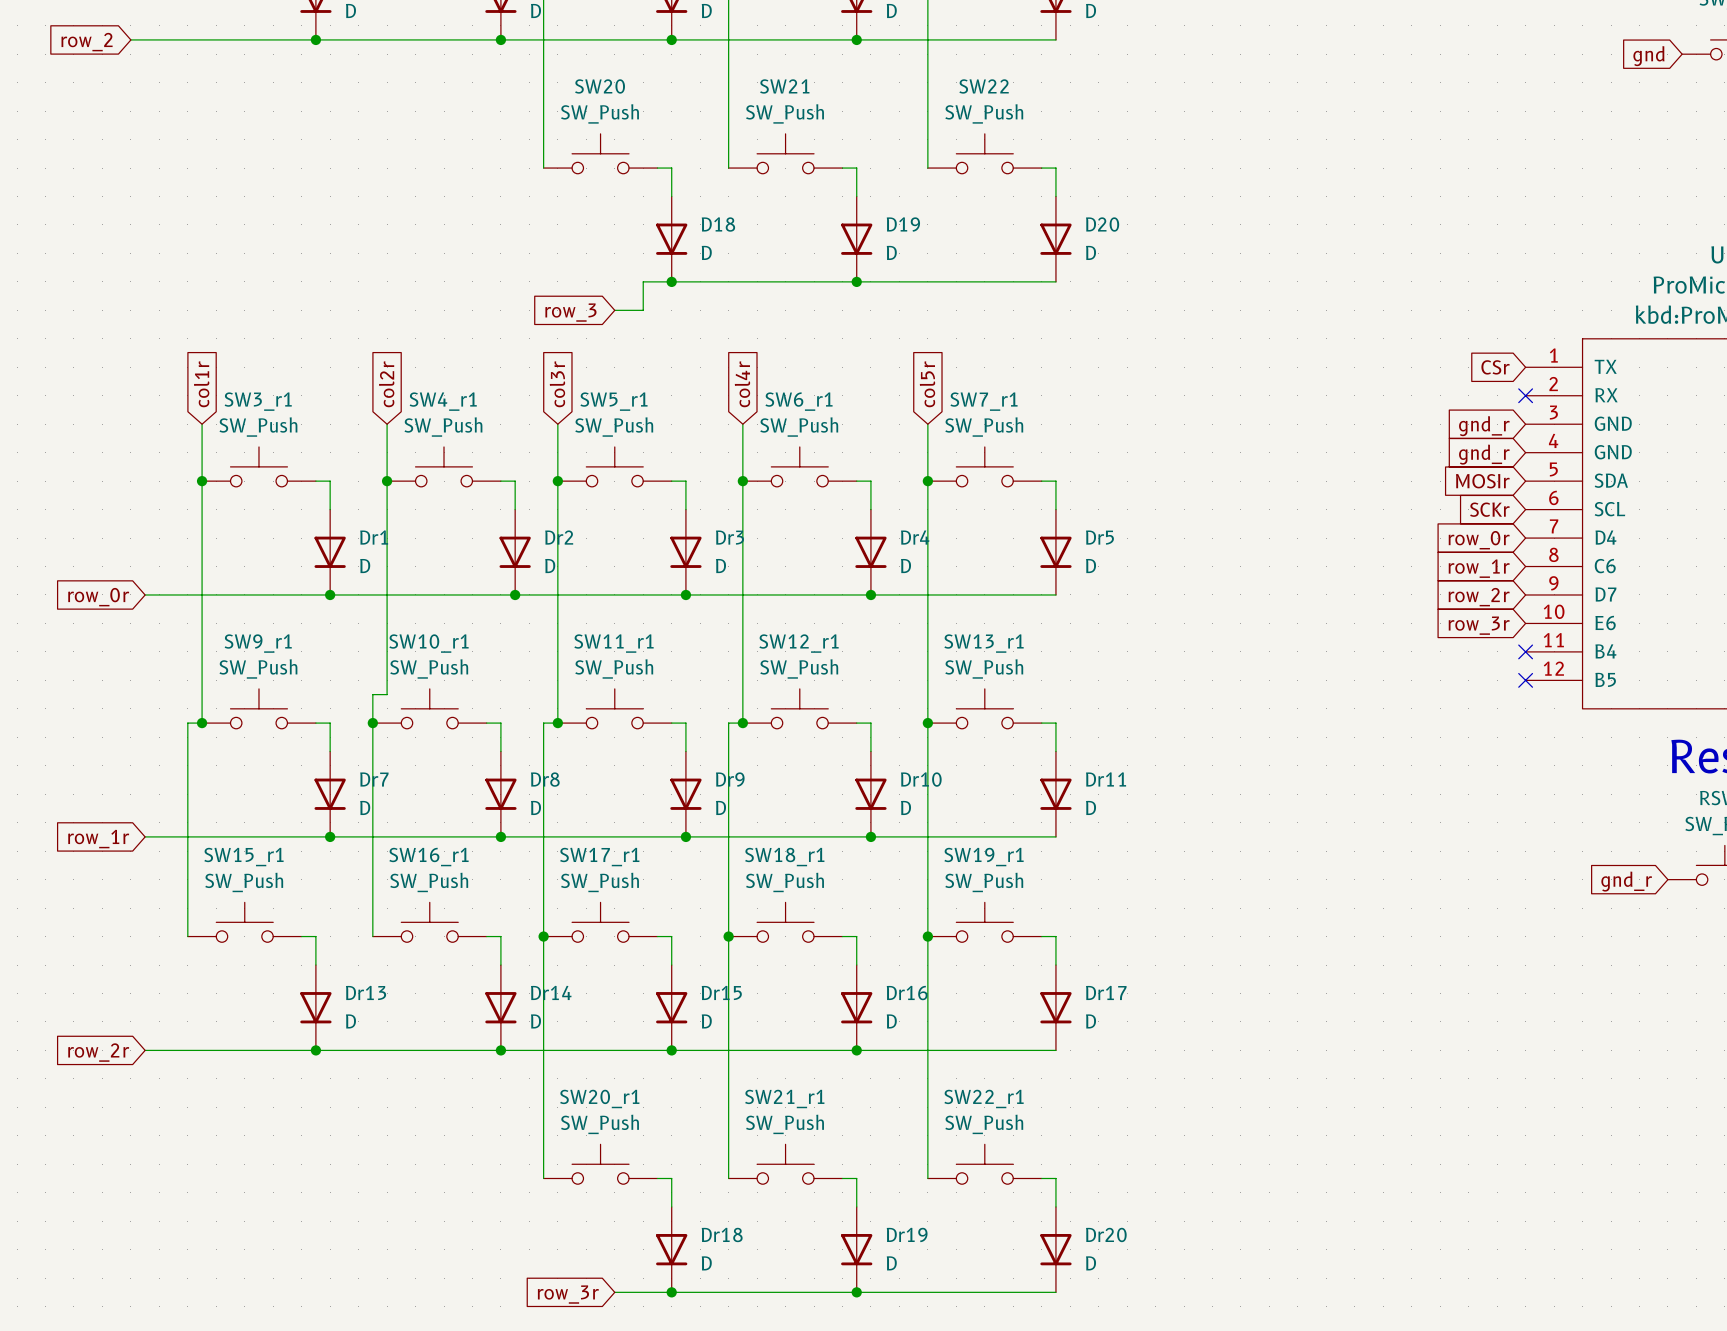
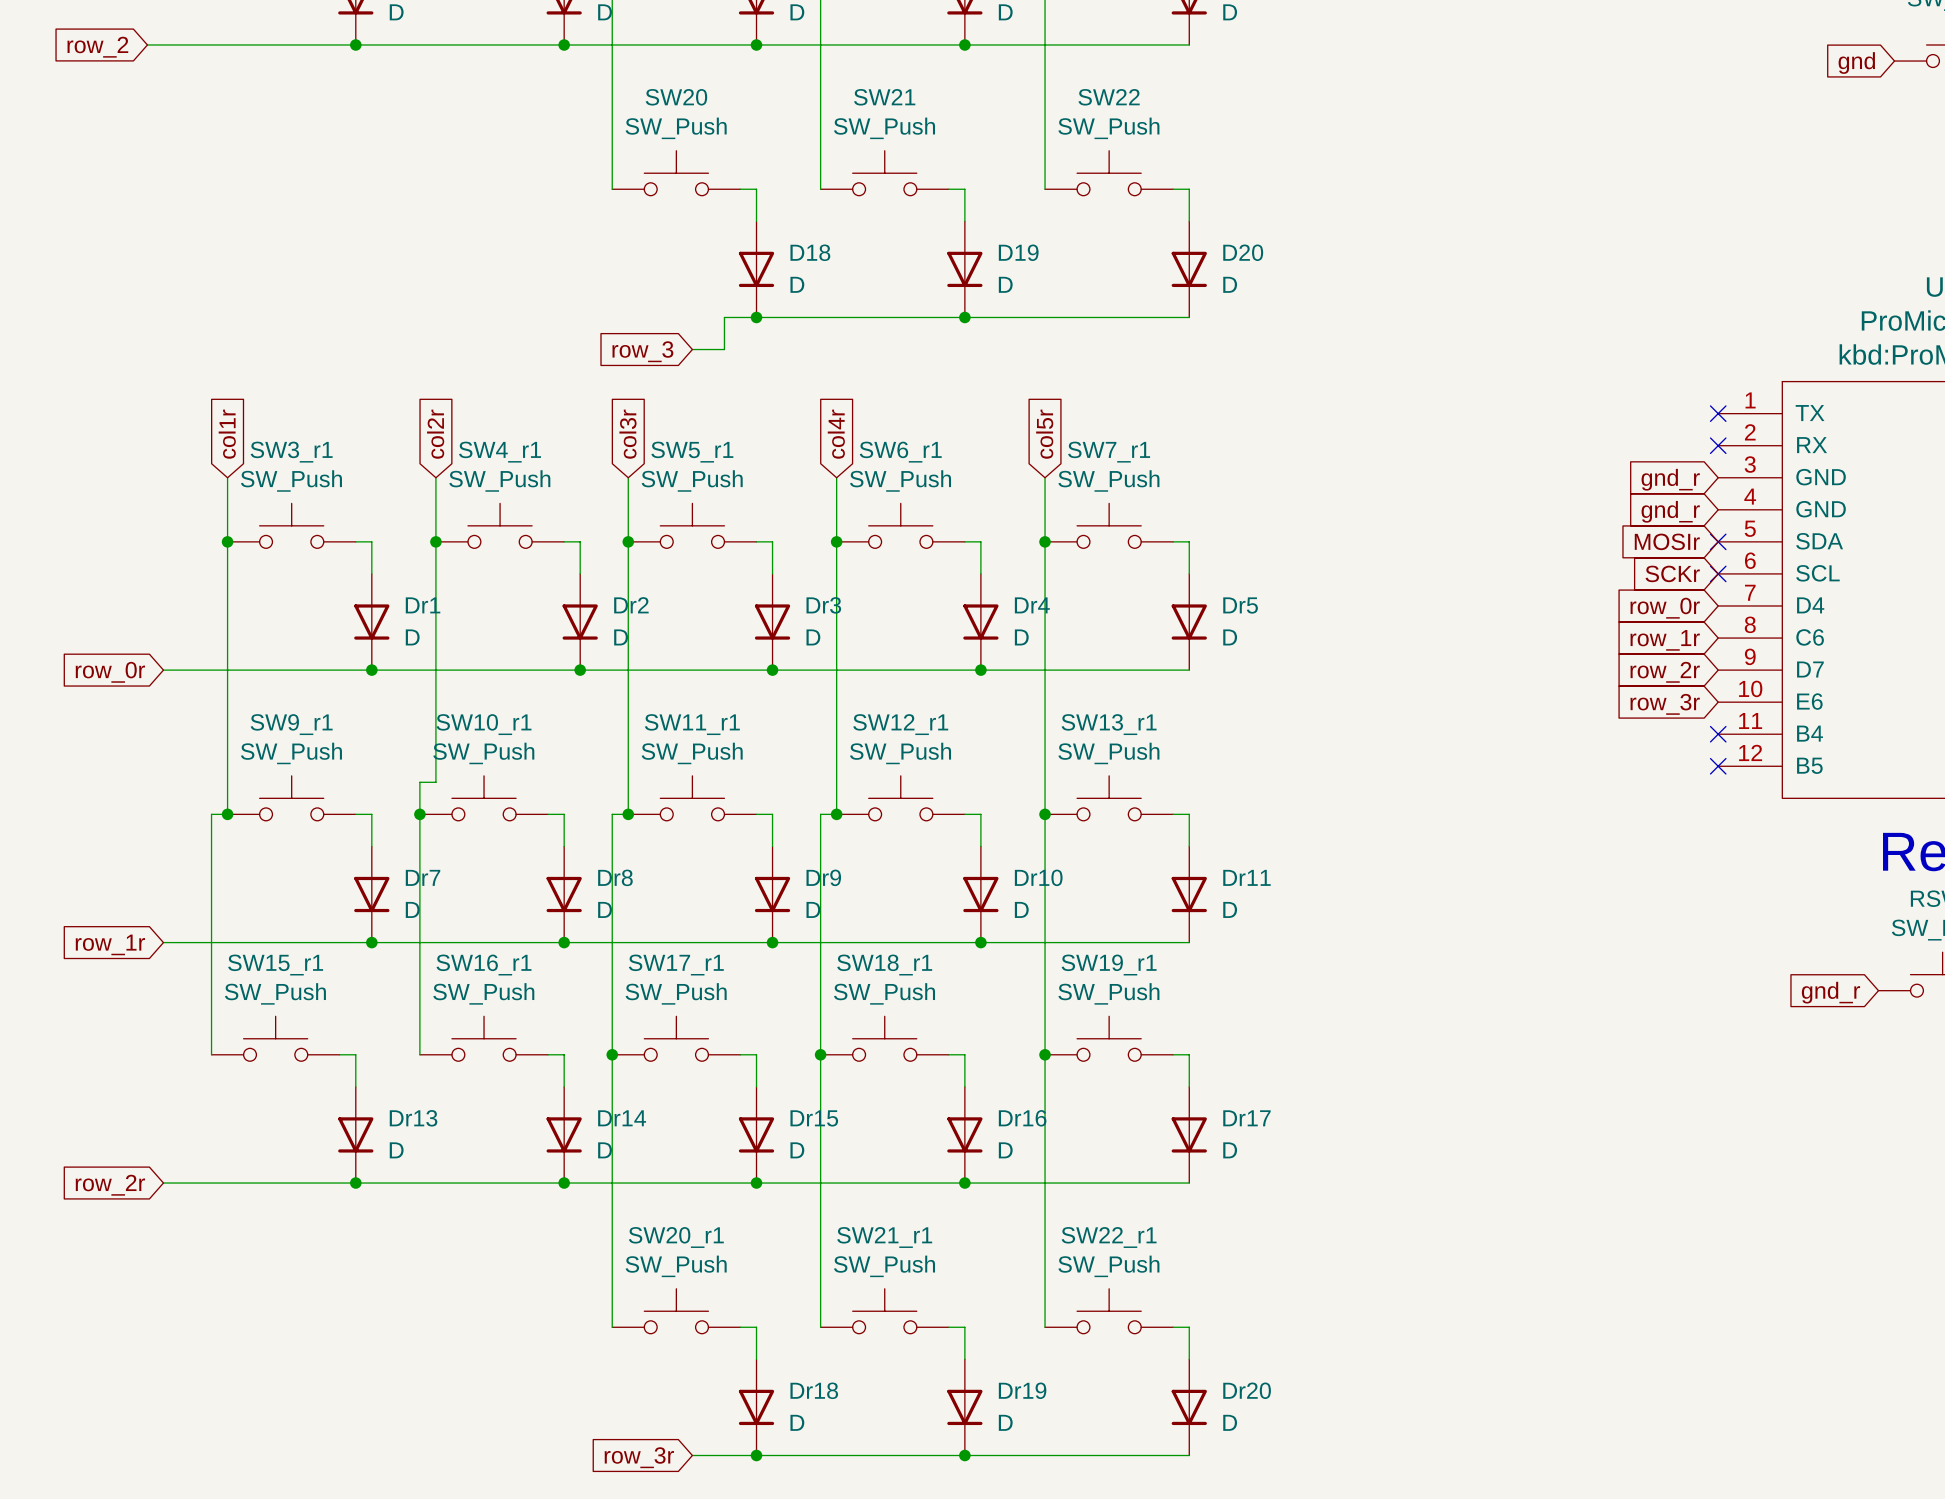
global label: CSr (1495, 367) -> none
no-connect mark: none -> (1718, 413)
no-connect mark: none -> (1718, 541)
no-connect mark: none -> (1718, 573)

